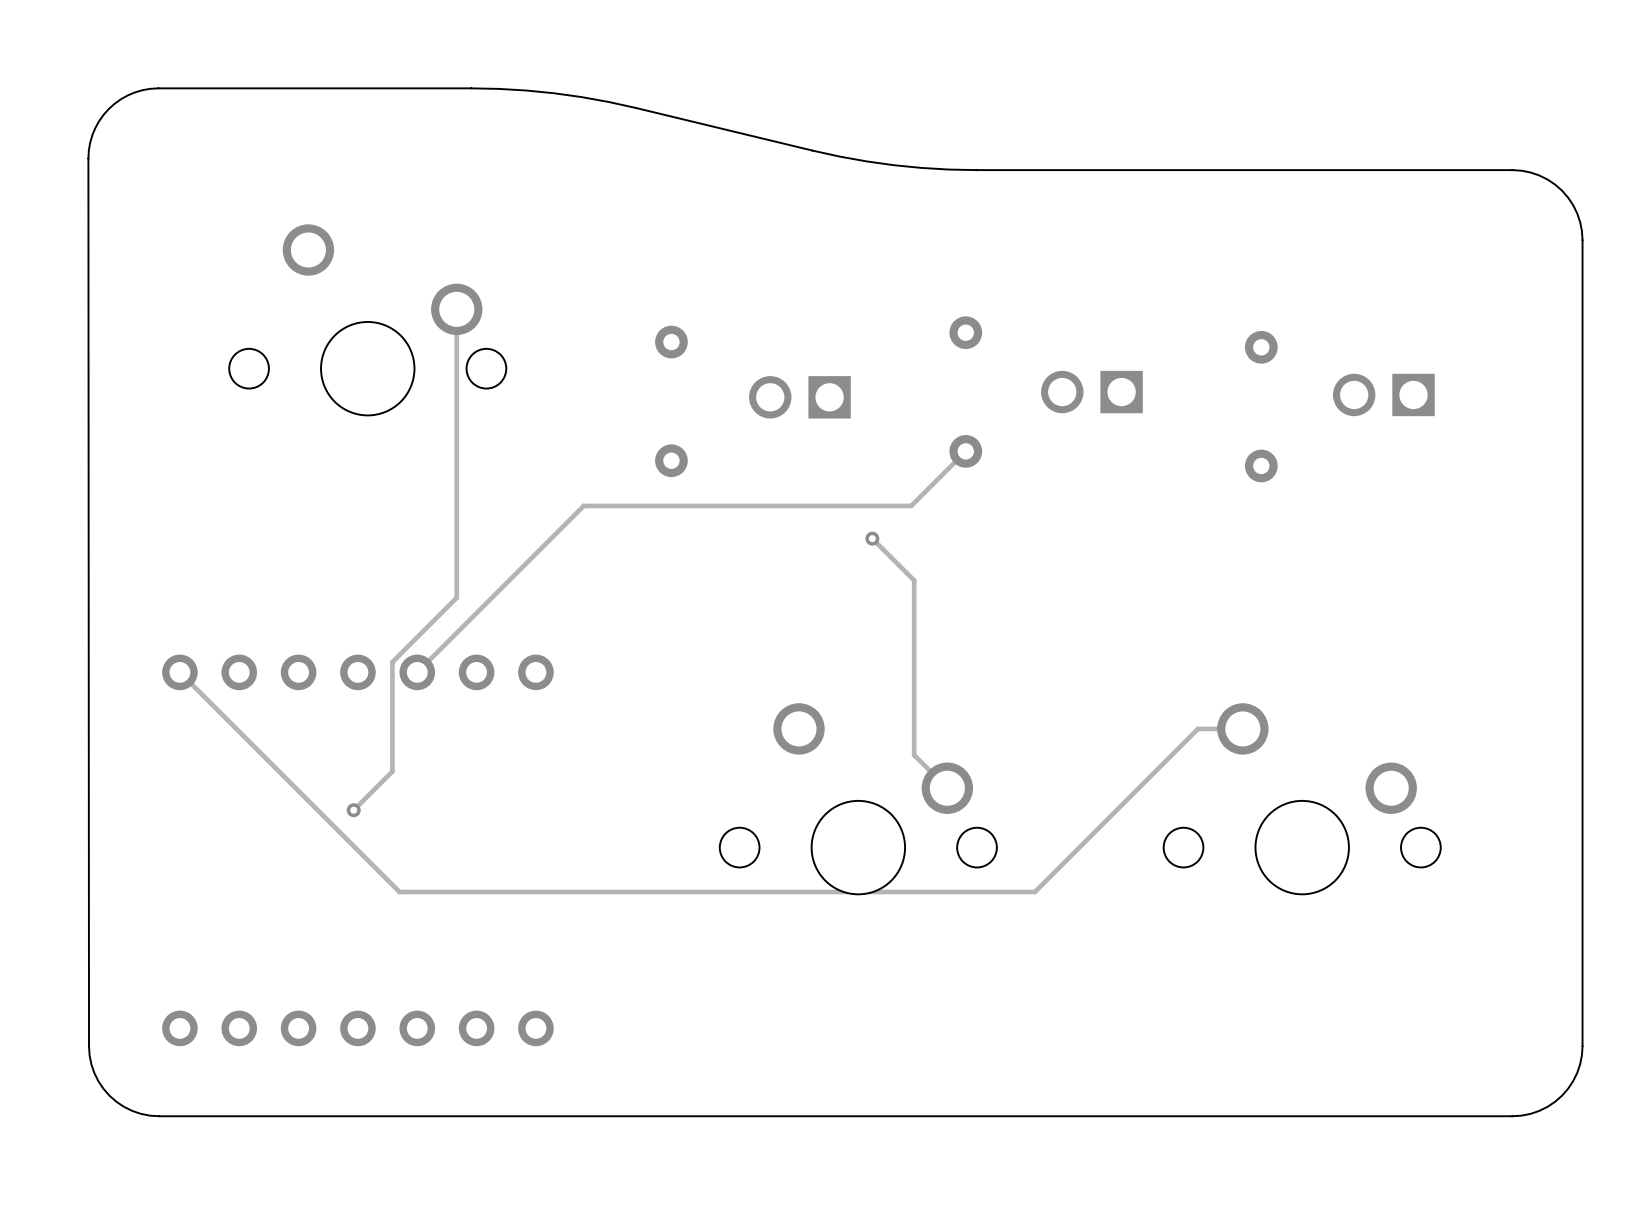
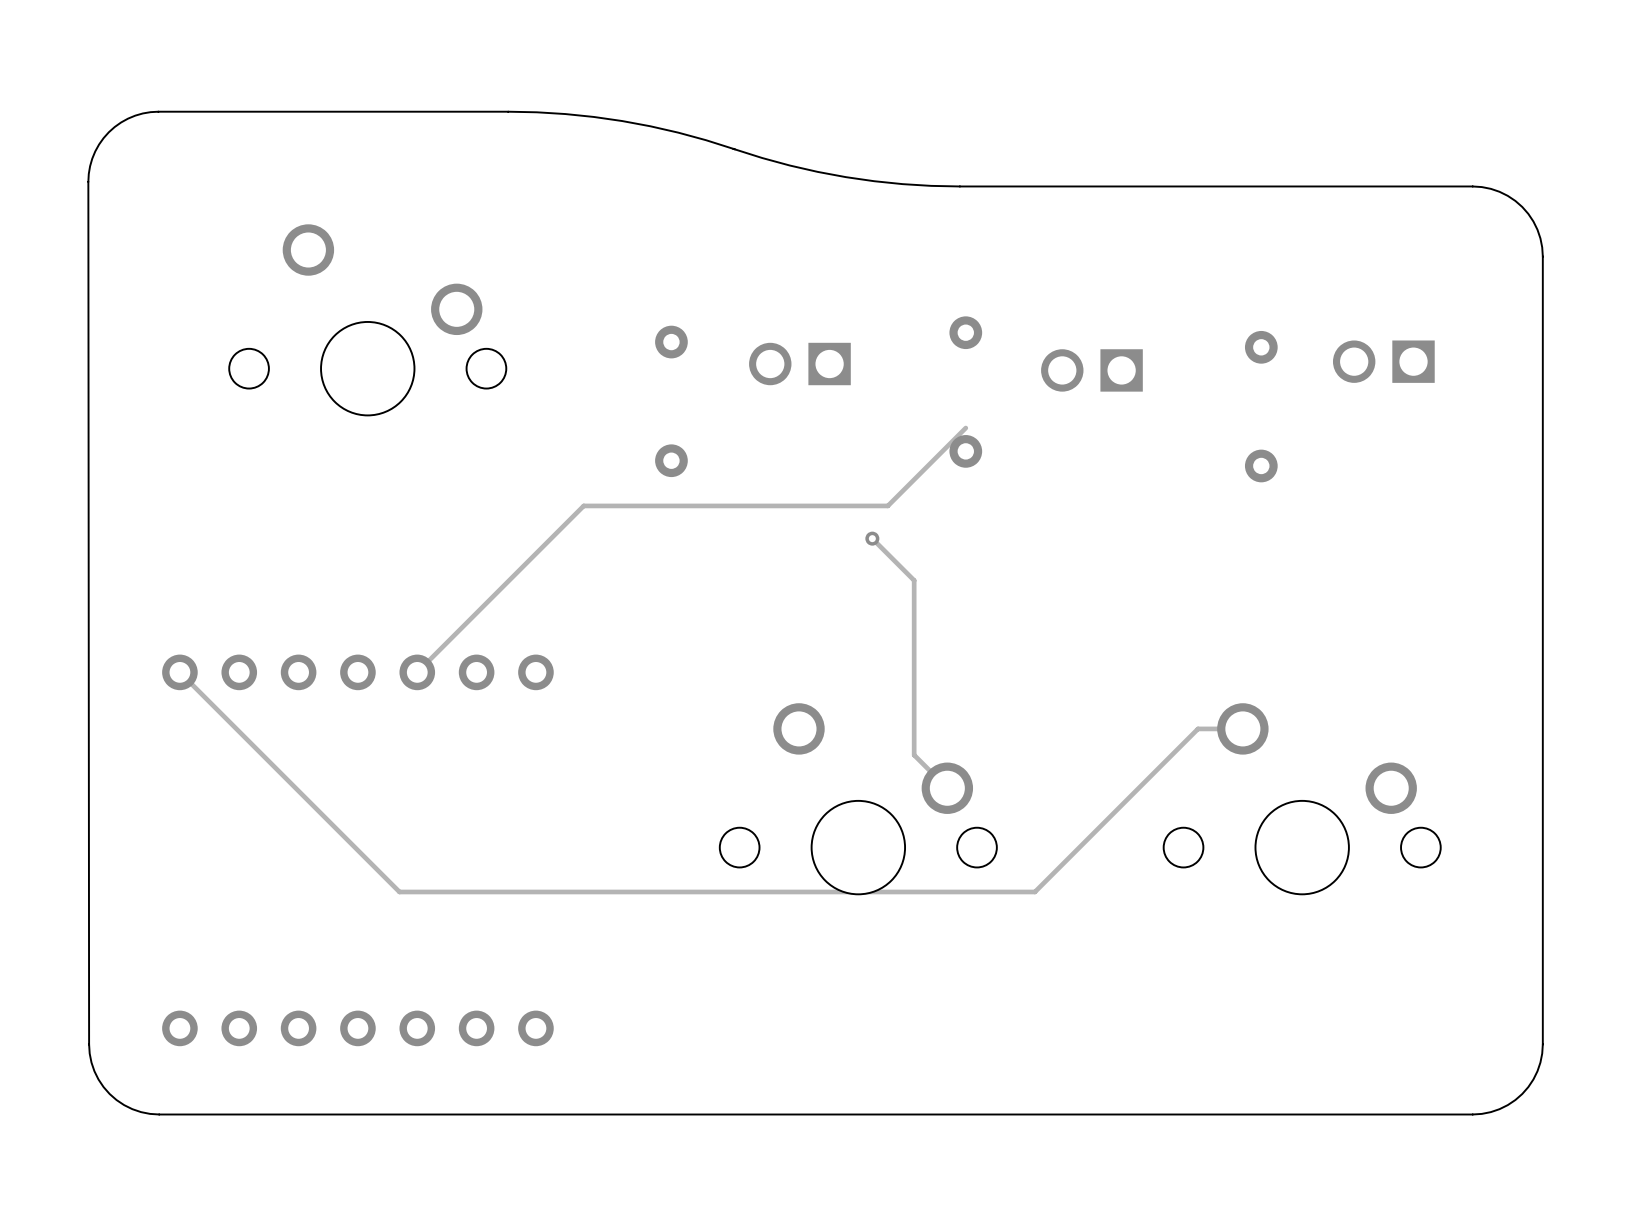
board edge: (471, 88) (150, 88) (128, 95) (114, 103) (99, 121) (92, 135) (88, 158) (89, 1046) (94, 1073) (109, 1095) (132, 1110) (159, 1116) (1512, 1116) (1539, 1110) (1562, 1095) (1577, 1072) (1582, 1046) (1582, 240) (1577, 213) (1562, 190) (1539, 175) (1512, 170) (976, 170) (921, 167) (839, 156) (635, 107) (581, 97) (526, 90) (471, 88) -> (508, 111) (565, 114) (622, 121) (678, 132) (762, 157) (817, 171) (902, 184) (959, 186) (1472, 186) (1499, 191) (1522, 206) (1537, 229) (1542, 256) (1542, 1044) (1537, 1071) (1522, 1093) (1499, 1109) (1472, 1114) (159, 1114) (132, 1109) (109, 1093) (94, 1071) (89, 1044) (88, 181) (92, 158) (103, 138) (114, 127) (135, 115) (150, 112) (508, 111)
track: (456, 309) (456, 597) (392, 662) (392, 771) (353, 810) -> none
part position: (1091, 392) -> (1091, 370)
part position: (1383, 394) -> (1383, 361)
part position: (799, 397) -> (799, 364)
track: (965, 451) (911, 505) (887, 505) -> (965, 428) (887, 505)
via: (353, 810) -> none

